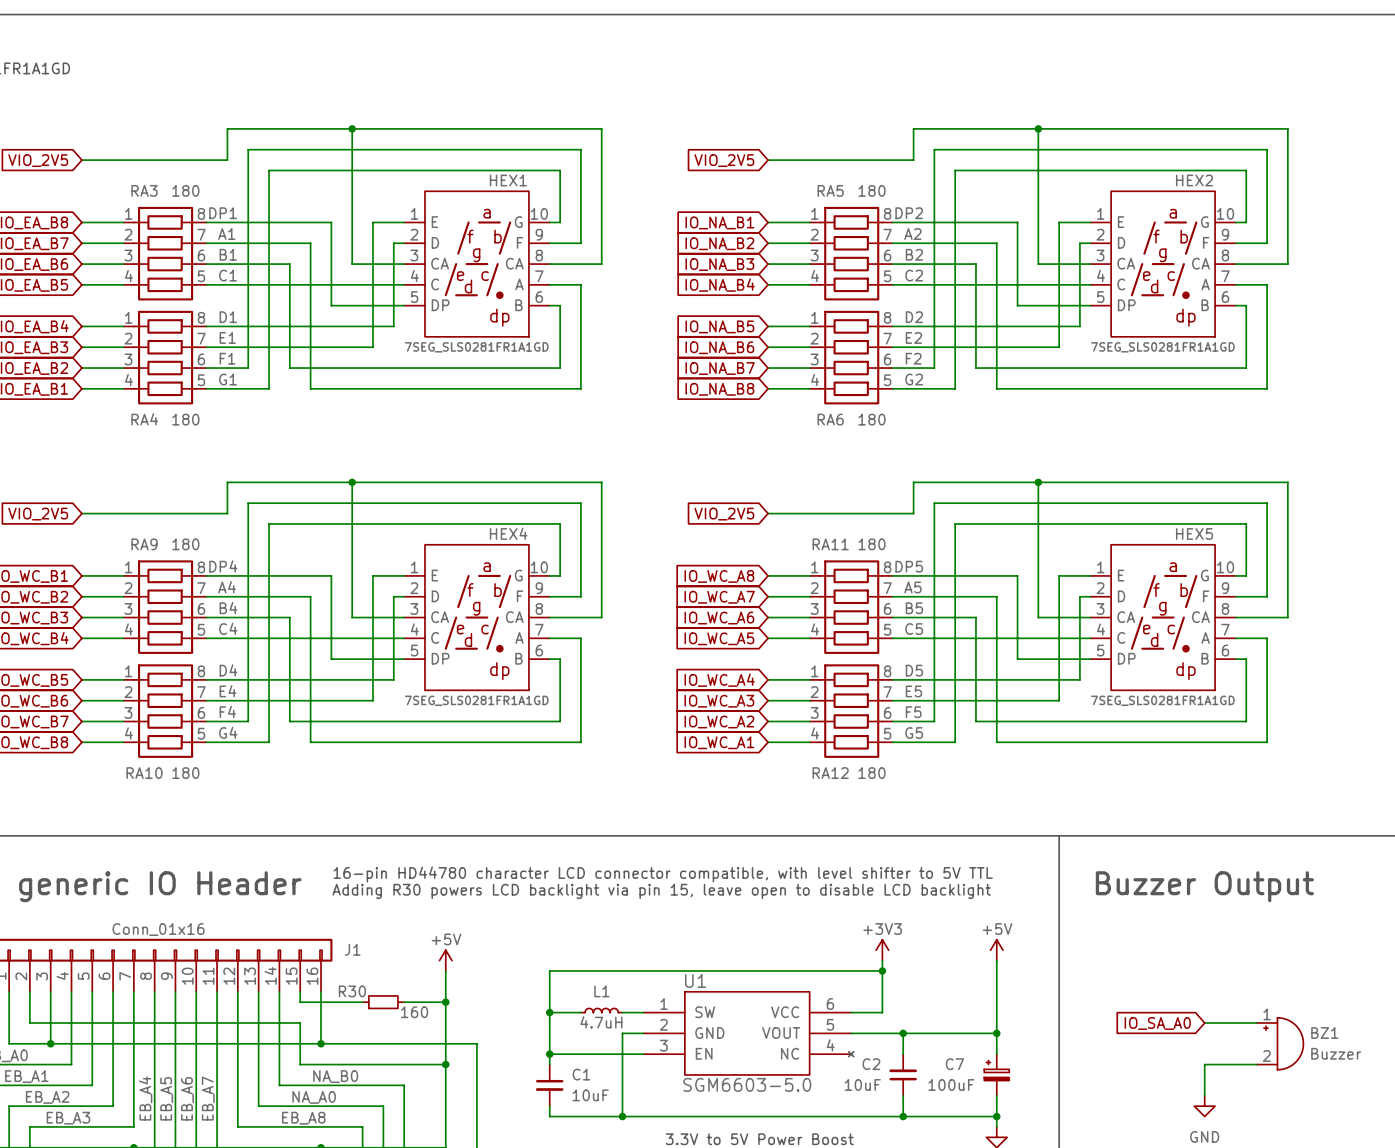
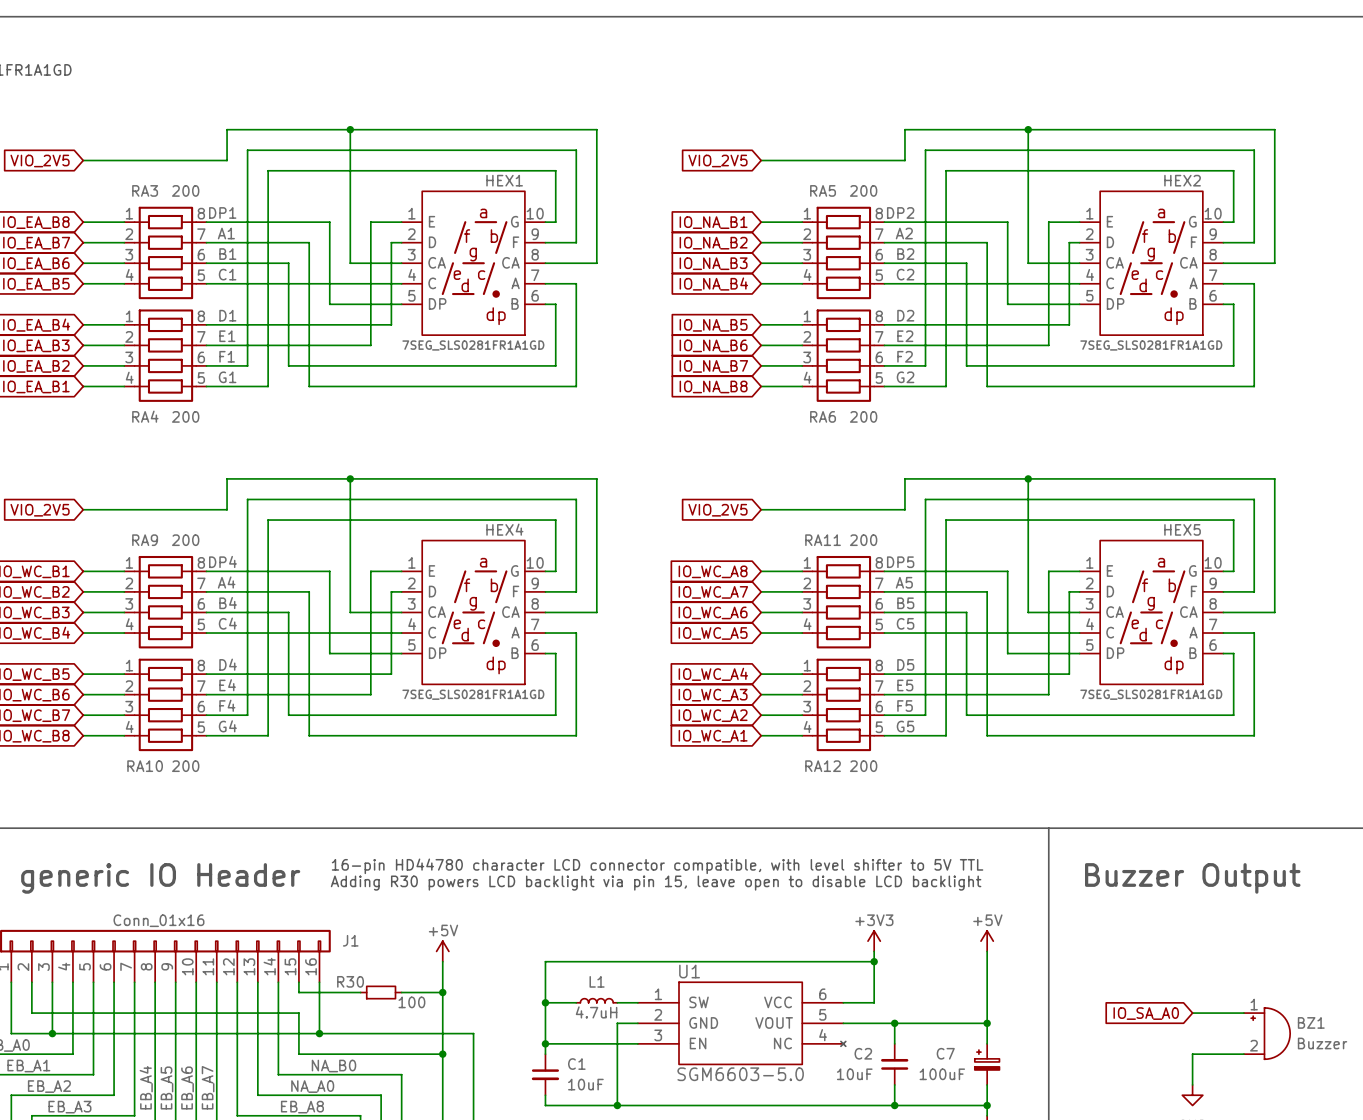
RA3 value: 180 (185, 190) -> 200 (185, 190)
RA5 value: 180 (872, 190) -> 200 (863, 190)
RA4 value: 180 (185, 419) -> 200 (185, 416)
RA6 value: 180 (872, 419) -> 200 (863, 416)
RA9 value: 180 (185, 544) -> 200 (185, 540)
RA11 value: 180 (872, 544) -> 200 (863, 540)
RA10 value: 180 (185, 773) -> 200 (185, 766)
RA12 value: 180 (872, 773) -> 200 (863, 766)
R30 value: 160 (414, 1012) -> 100 (411, 1002)

